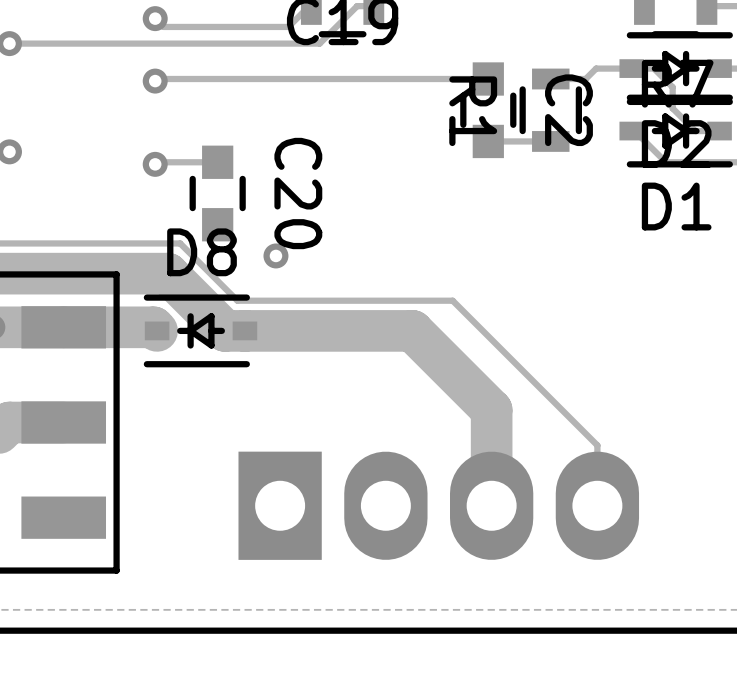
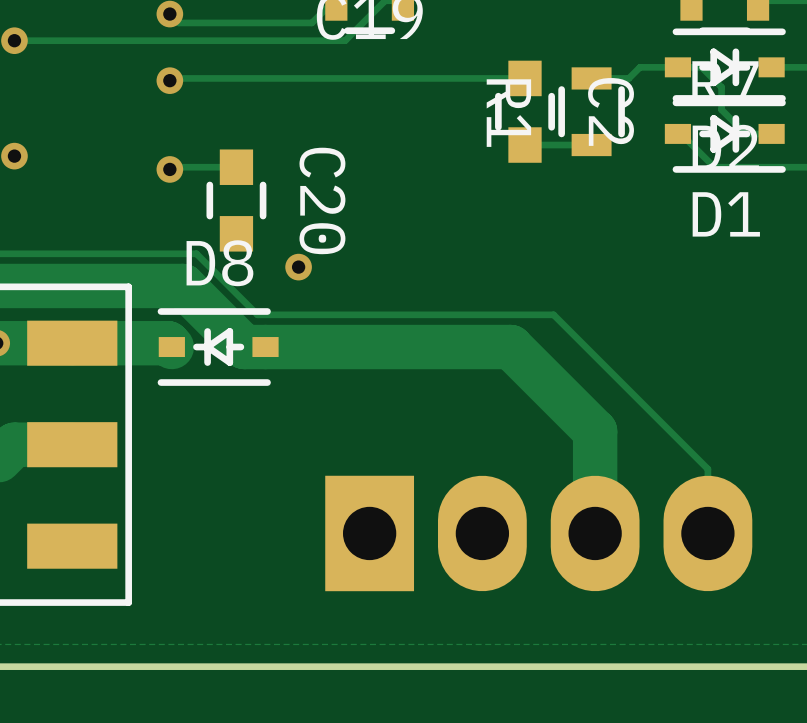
track: (452, 300) (597, 445) (597, 518) -> (487, 314) (553, 314) (707, 469) (707, 546)
track: (412, 330) (491, 410) (491, 505) -> (444, 347) (510, 347) (595, 431) (595, 533)
part position: (438, 505) -> (538, 533)

